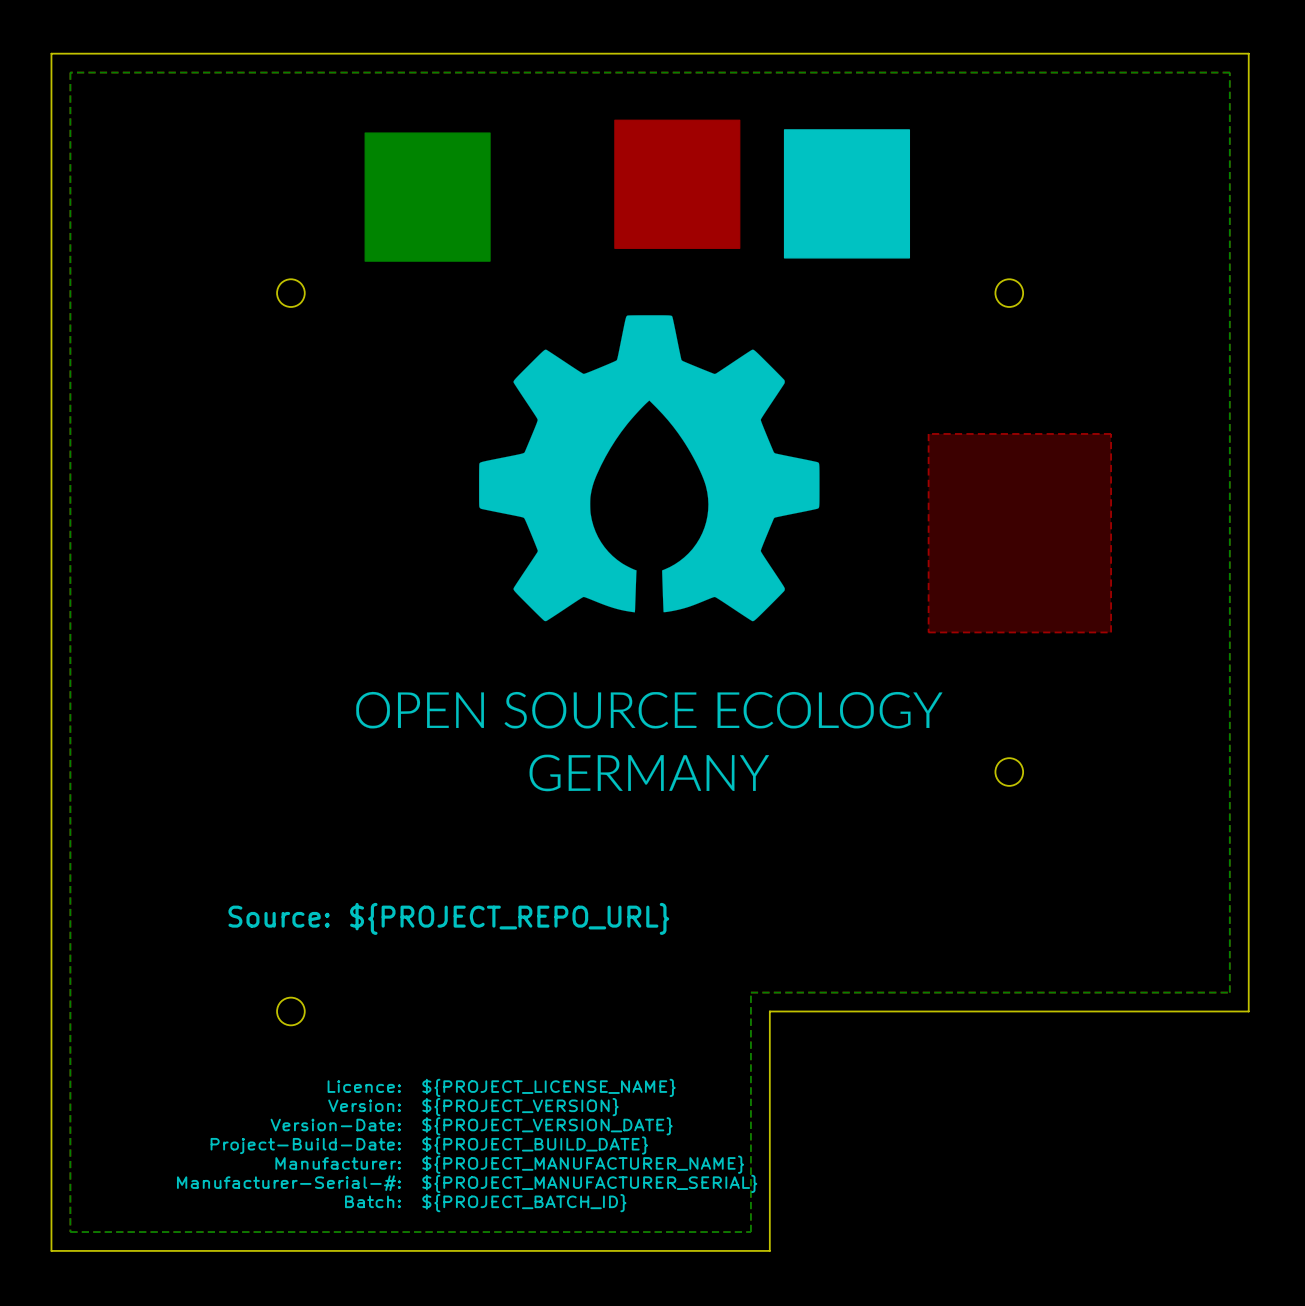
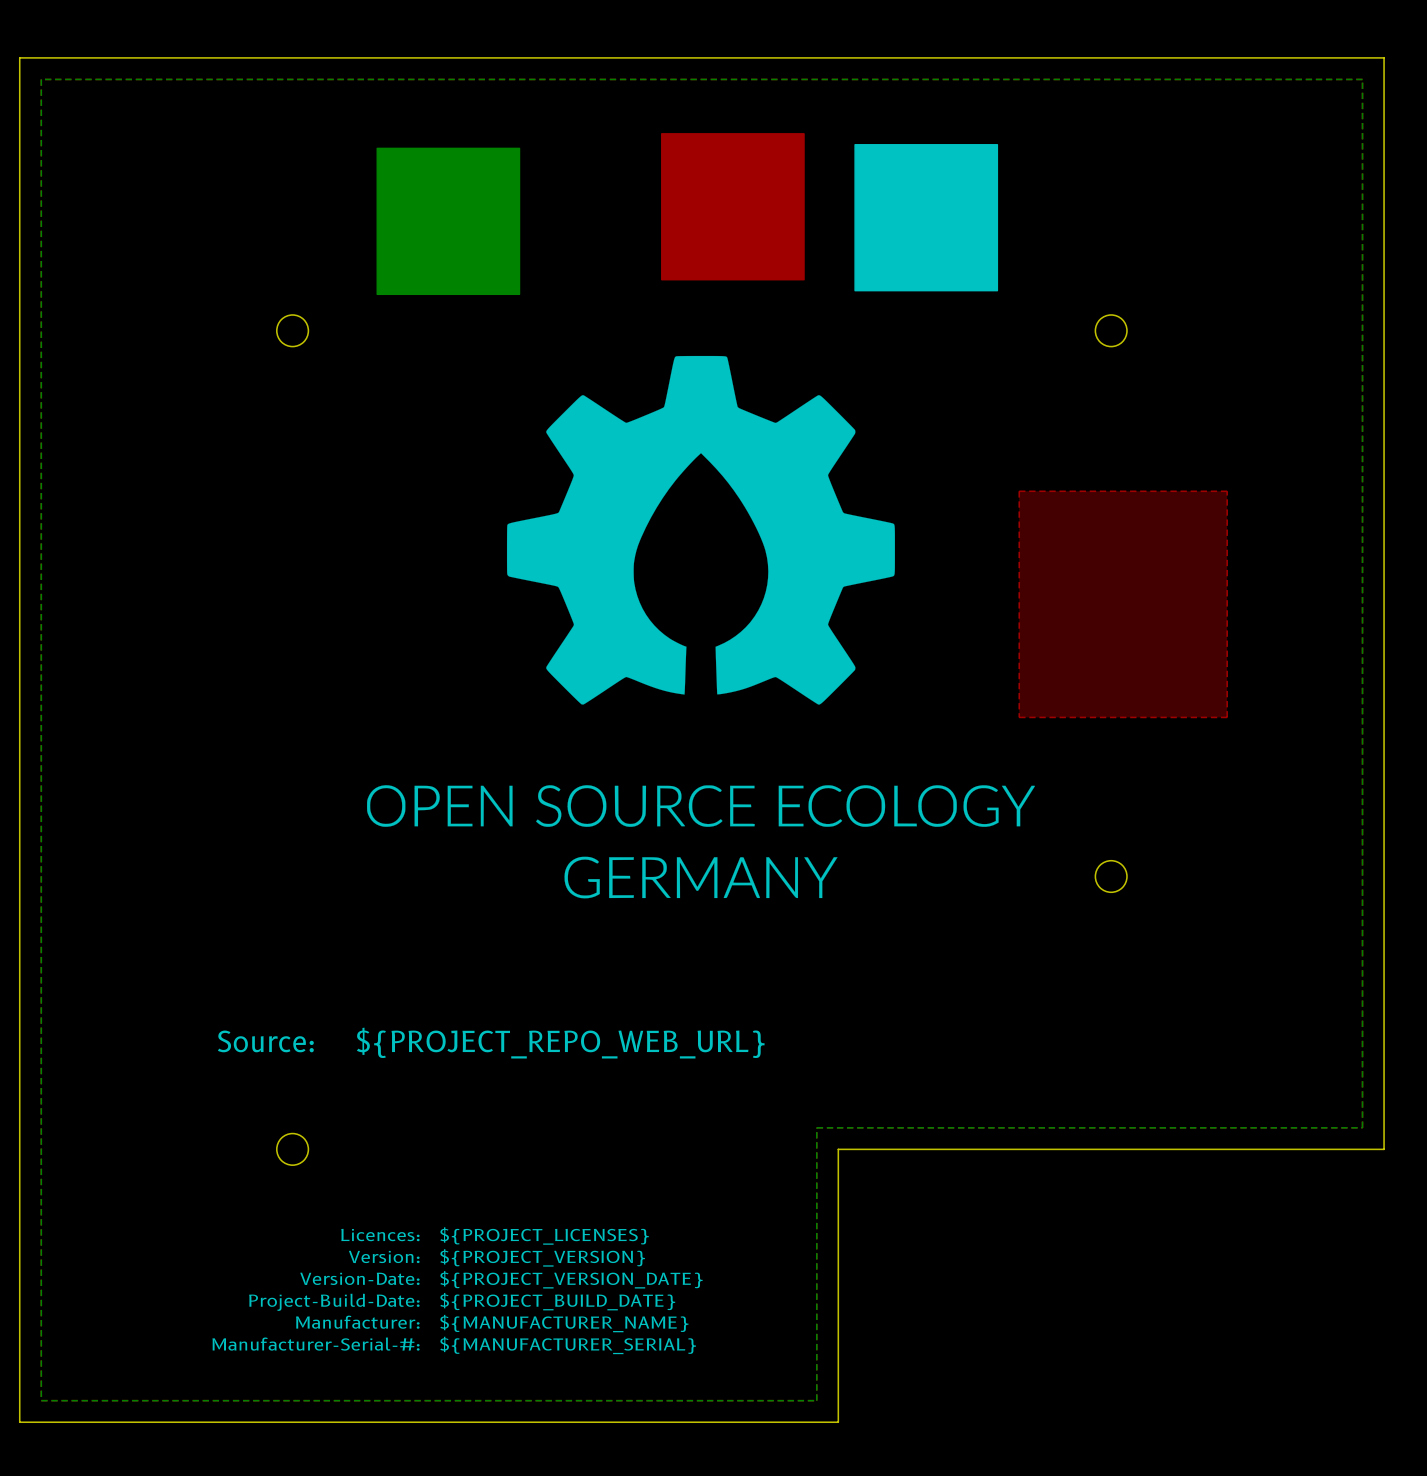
text: ${PROJECT_REPO_URL} (509, 918) -> ${PROJECT_REPO_WEB_URL} (560, 1043)
text: Licence: (364, 1086) -> Licences: (380, 1235)
text: ${PROJECT_LICENSE_NAME} (548, 1087) -> ${PROJECT_LICENSES} (544, 1235)
text: ${PROJECT_MANUFACTURER_NAME} (583, 1164) -> ${MANUFACTURER_NAME} (564, 1323)
text: ${PROJECT_MANUFACTURER_SERIAL} (589, 1183) -> ${MANUFACTURER_SERIAL} (568, 1345)
text: Batch: (372, 1201) -> none
text: ${PROJECT_BATCH_ID} (524, 1203) -> none

